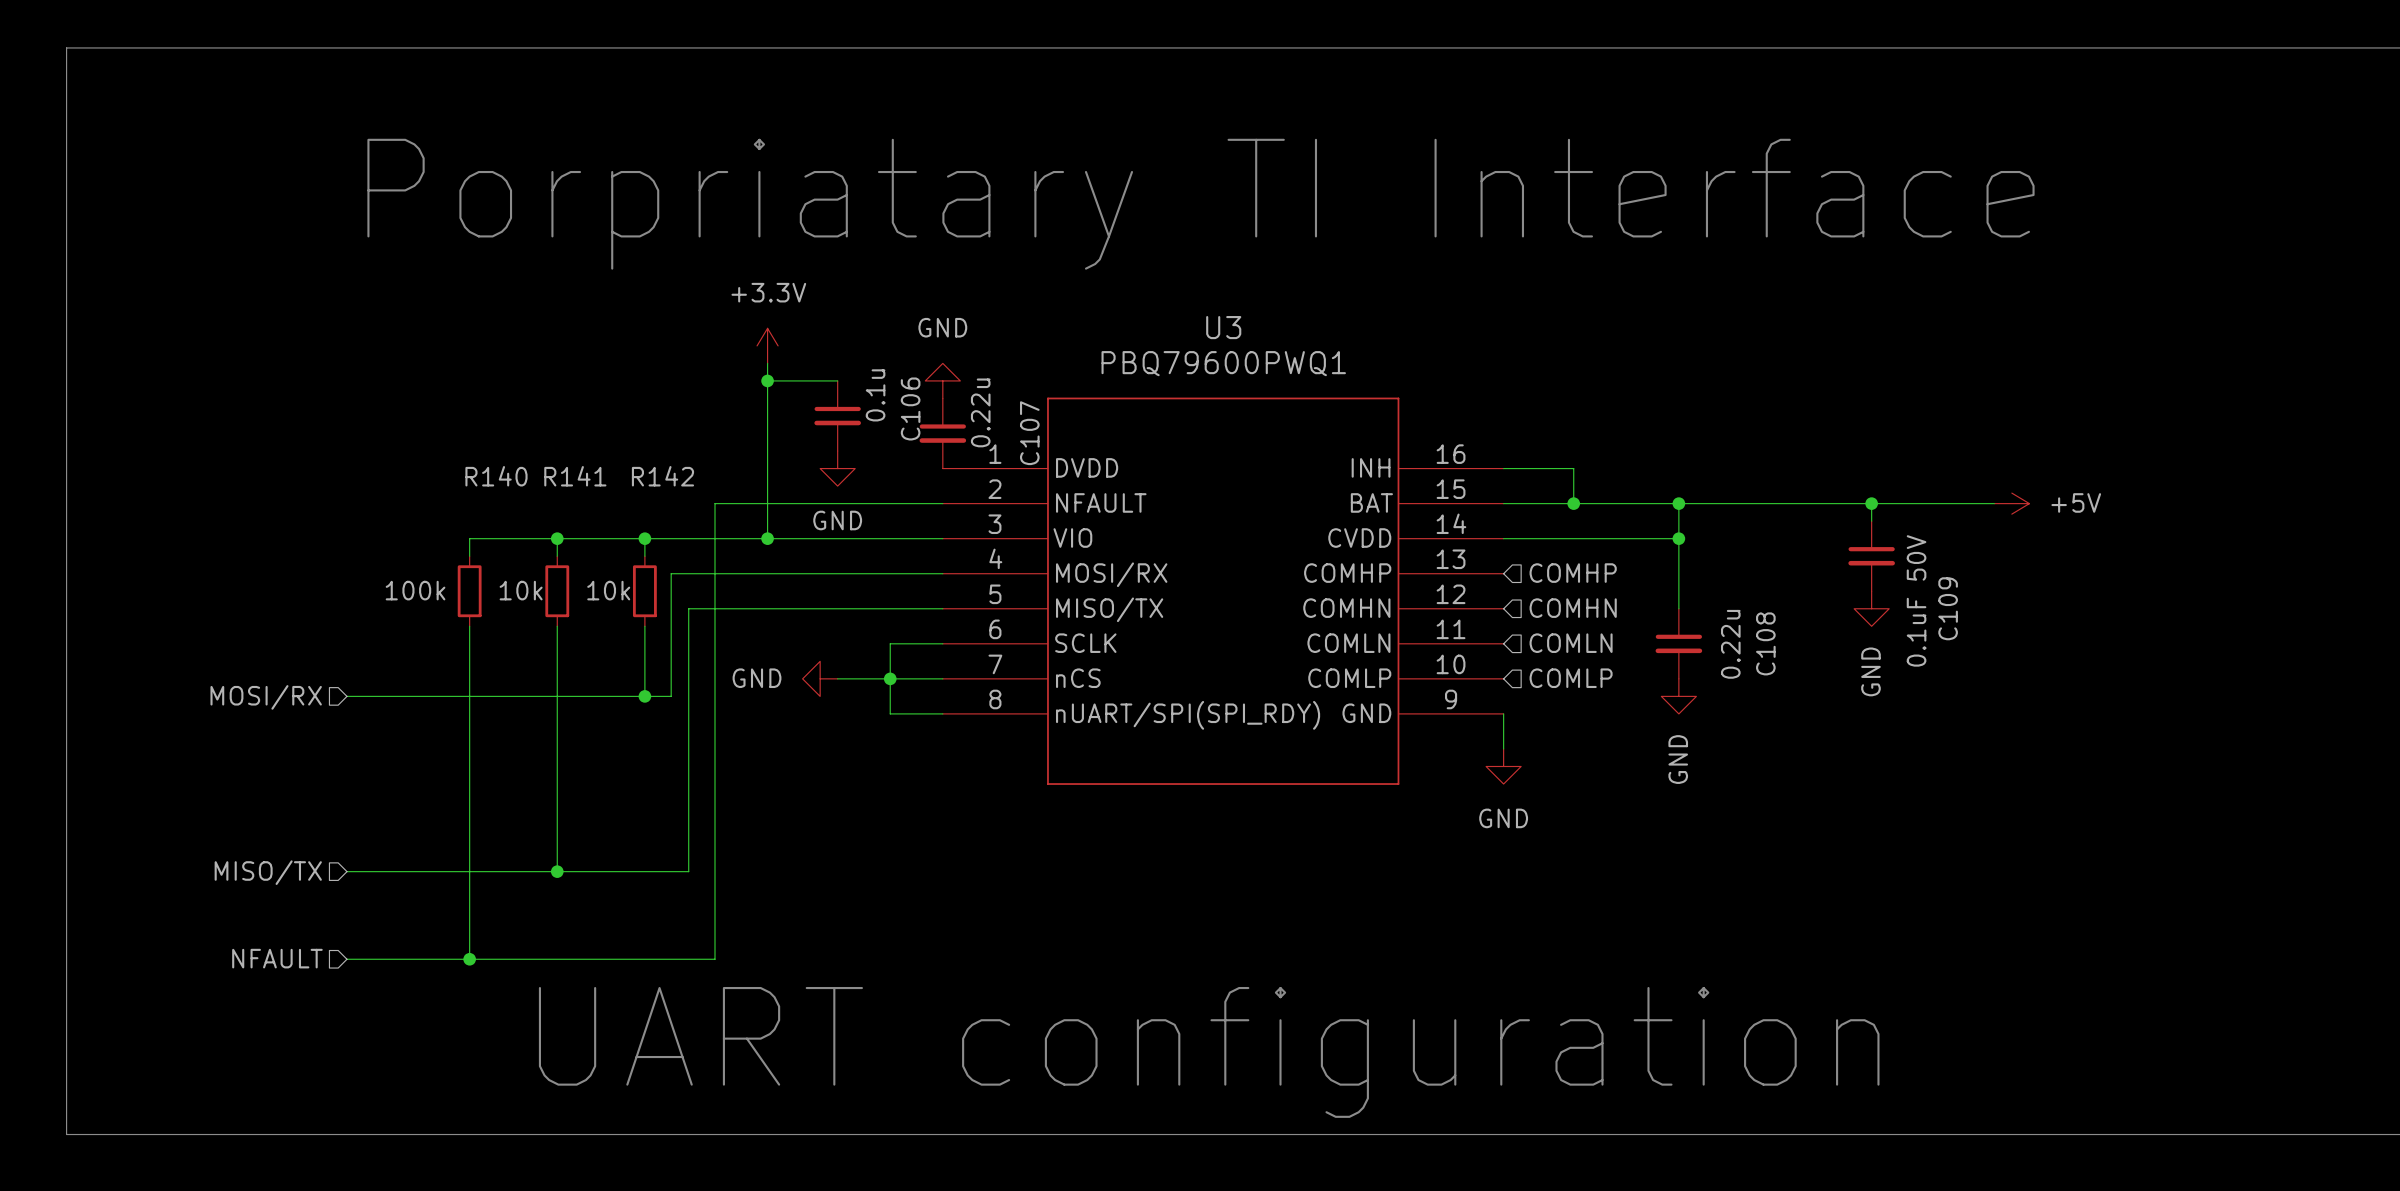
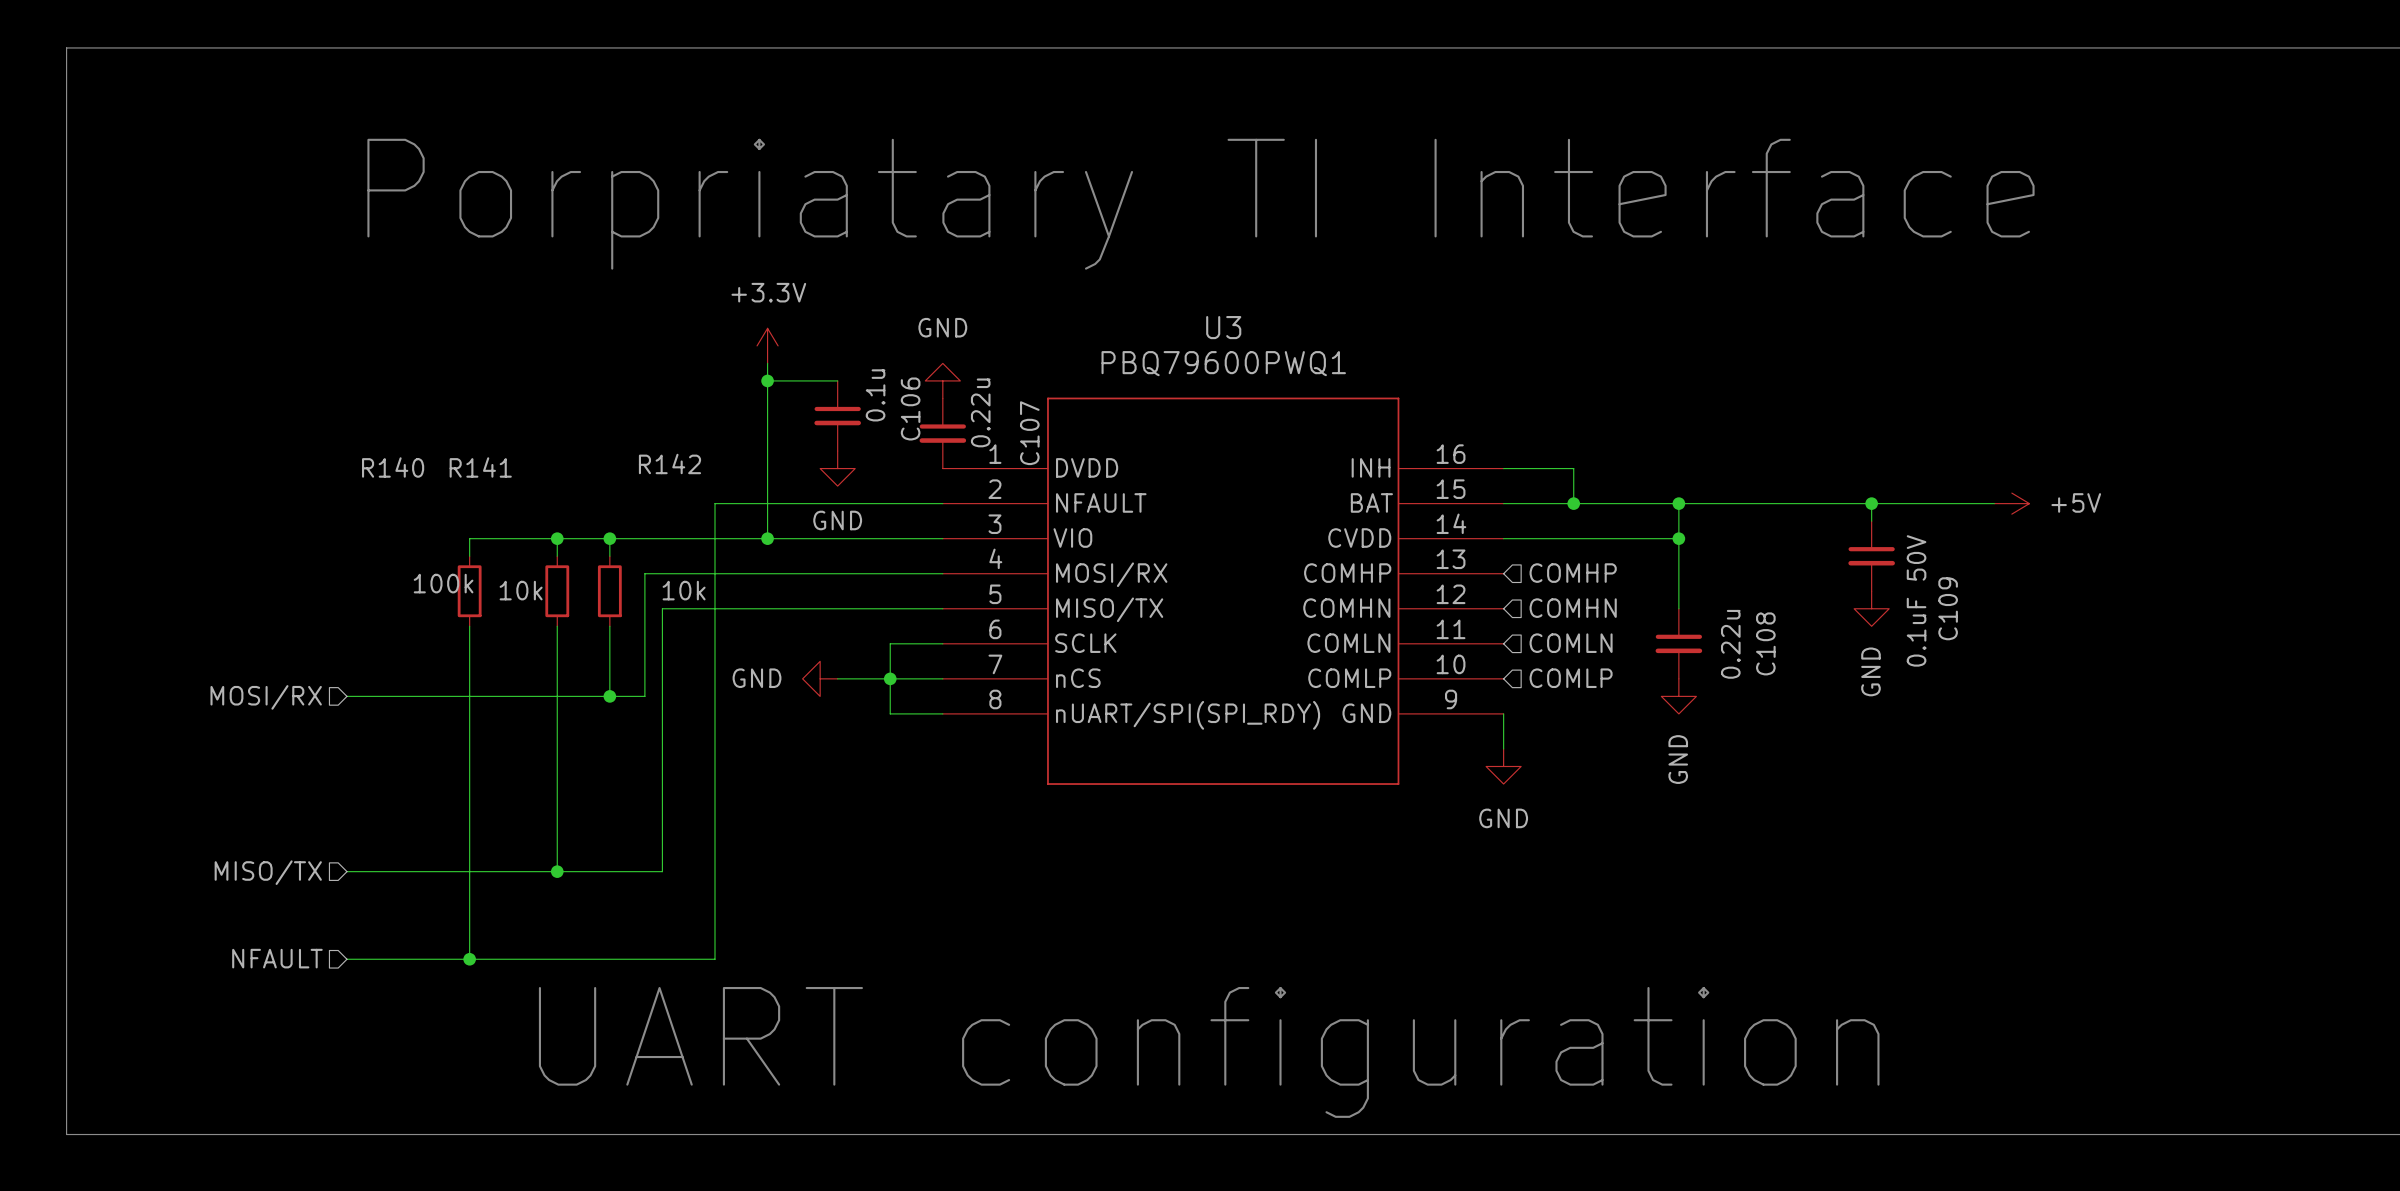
R140 name position: R140 (496, 476) -> R140 (393, 467)
R141 name position: R141 (575, 476) -> R141 (480, 467)
R142 name position: R142 (662, 476) -> R142 (669, 463)
wire: (644, 538) (644, 556) -> (609, 538) (609, 556)
junction position: (644, 538) -> (609, 538)
wire: (671, 573) (671, 696) (644, 696) -> (671, 573) (644, 573) (644, 626)
R140 value position: 100k (415, 590) -> 100k (443, 583)
R142 value position: 10k (608, 590) -> 10k (684, 590)
R142 position: (644, 591) -> (609, 591)
wire: (688, 608) (688, 871) (662, 871) -> (688, 608) (662, 608) (662, 871)
wire: none -> (609, 626) (609, 696)
junction position: (644, 696) -> (609, 696)

